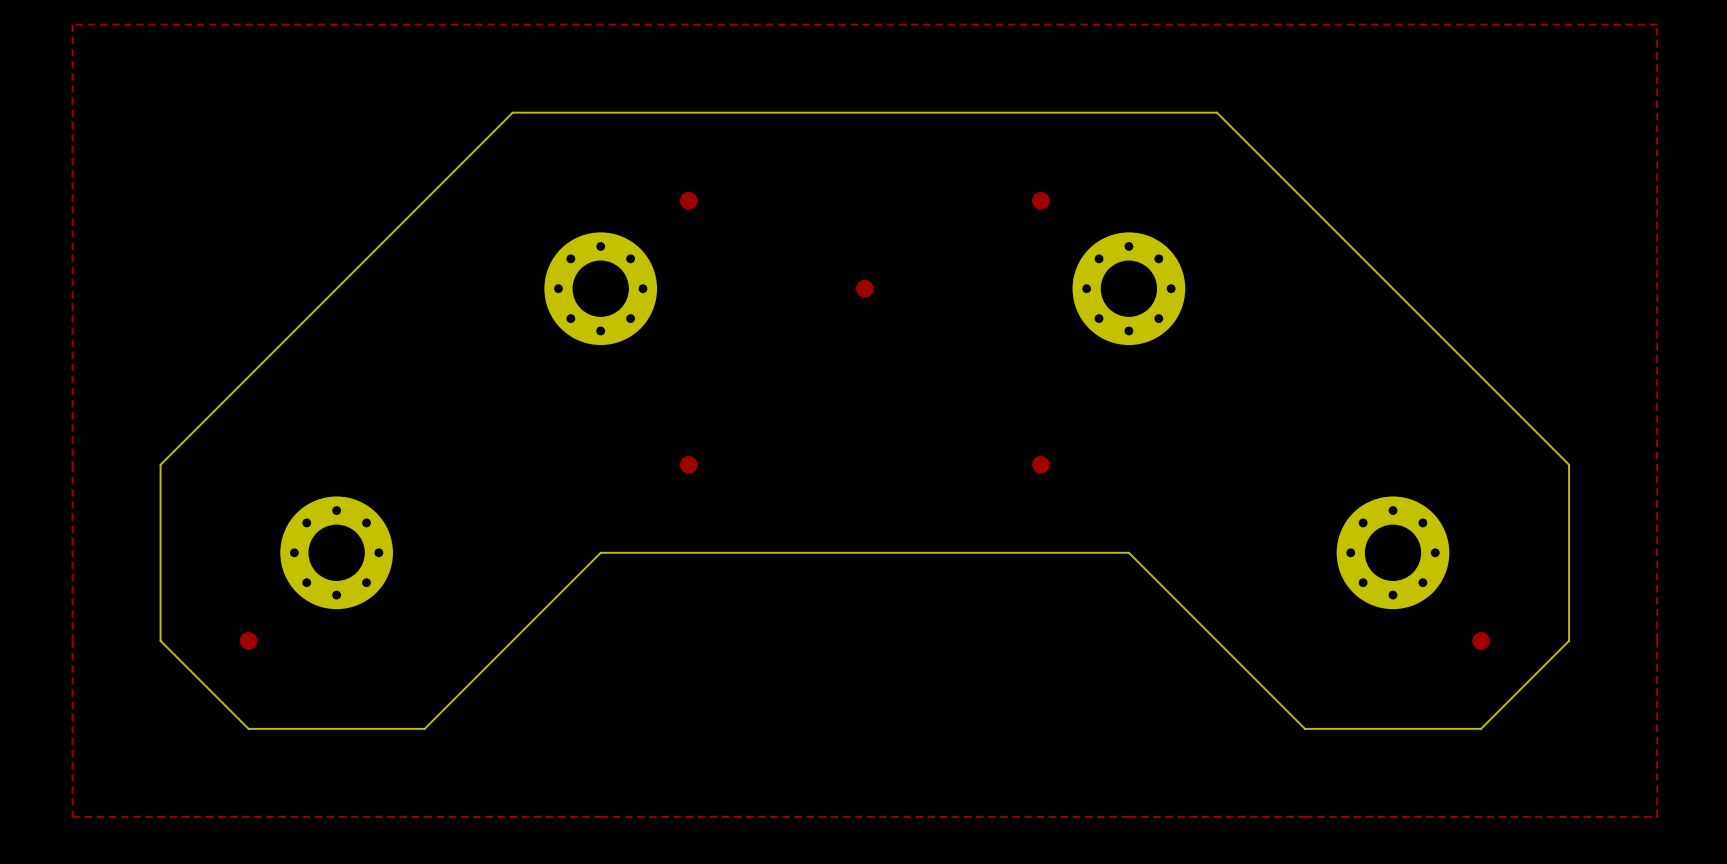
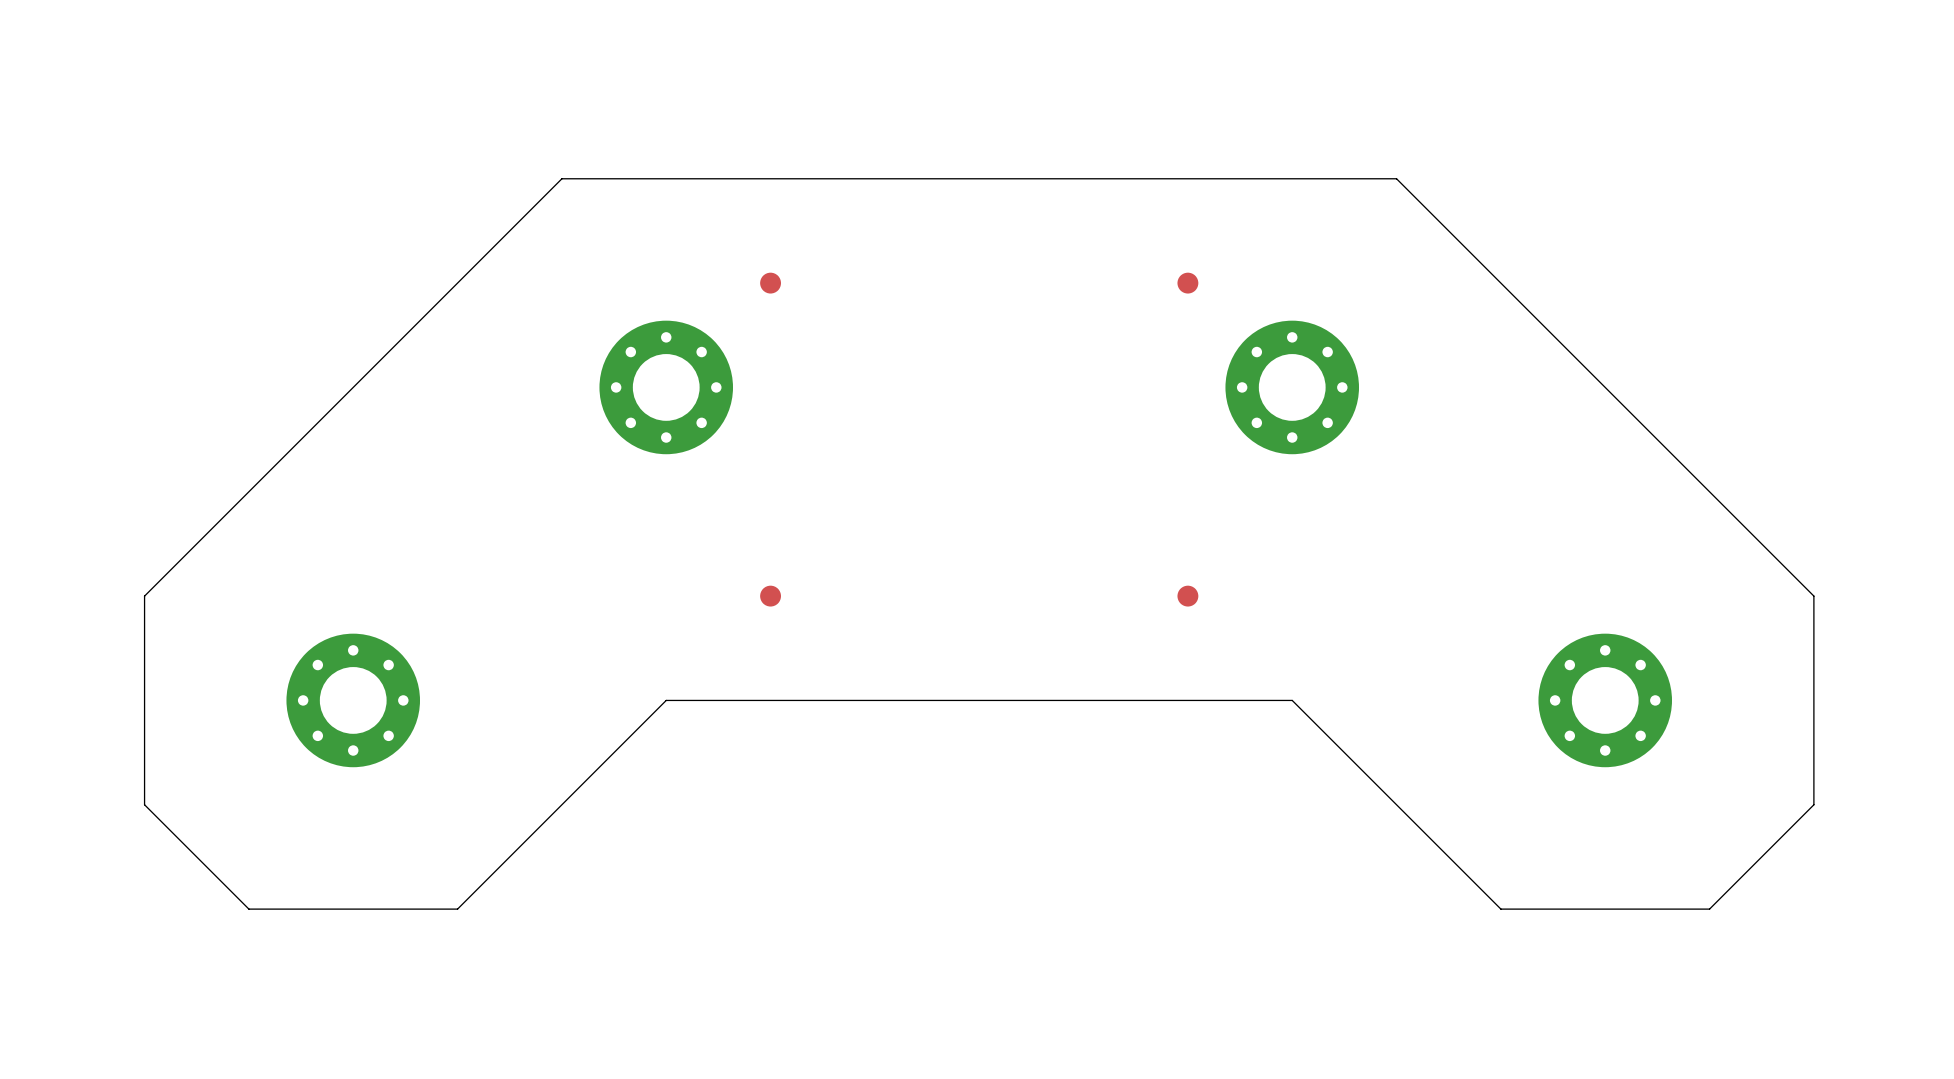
top zone outline: (1657, 24) (1657, 816) (72, 816) (72, 24) (1657, 24) -> none
part: (864, 288) -> none
part: (248, 640) -> none
part: (1481, 640) -> none

